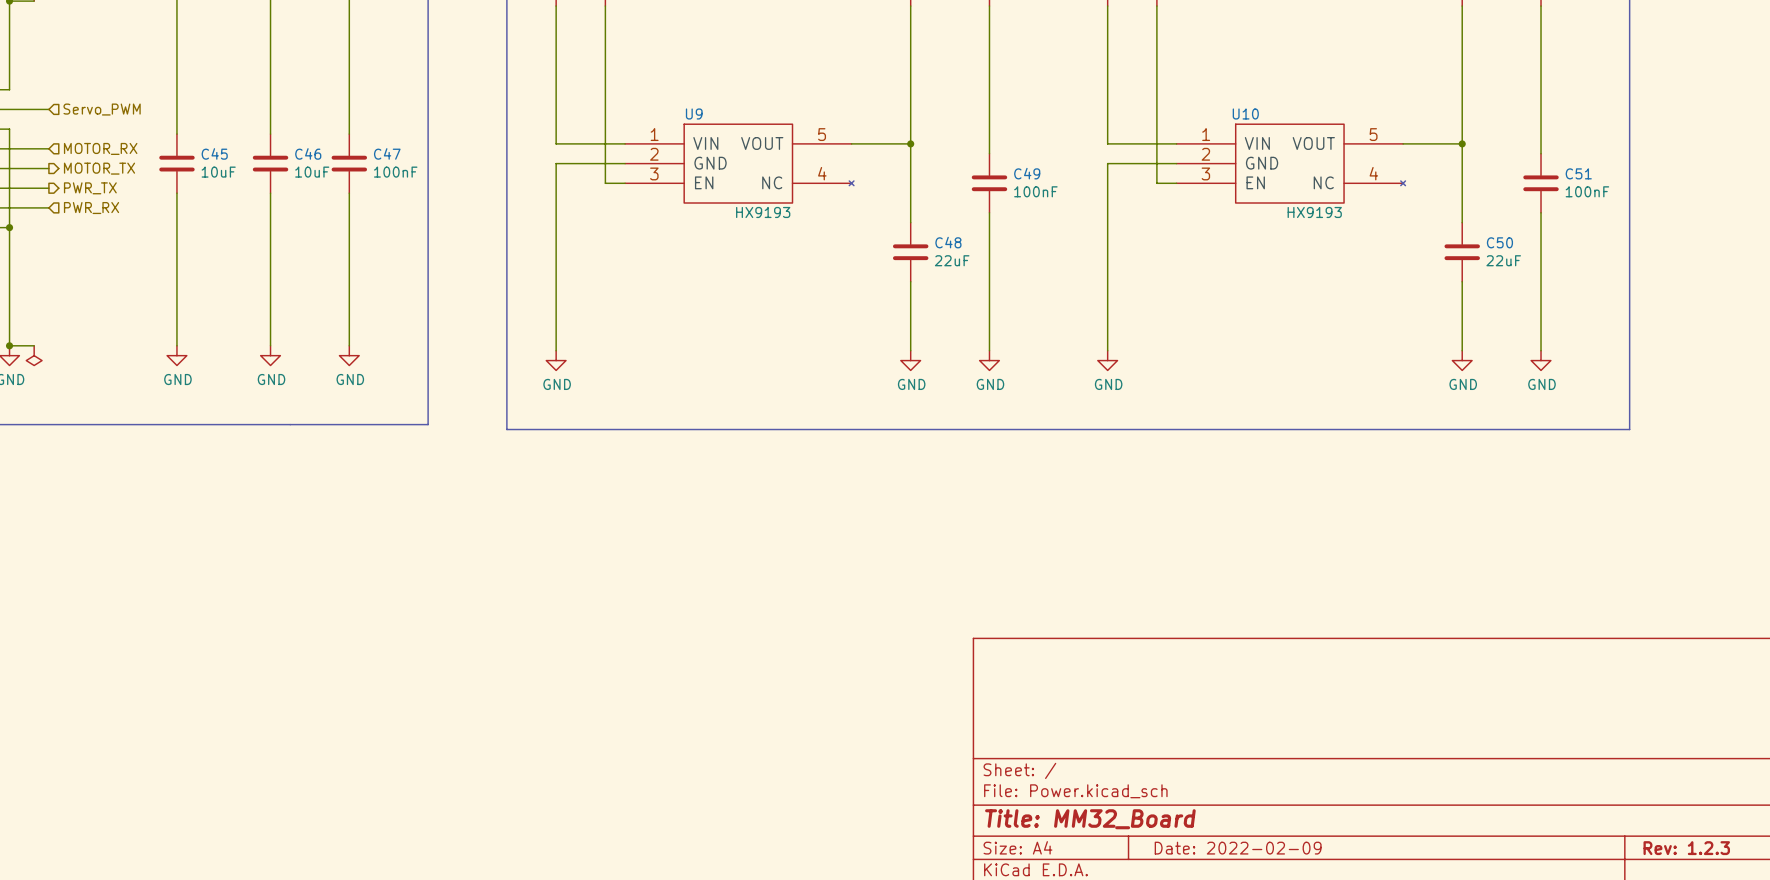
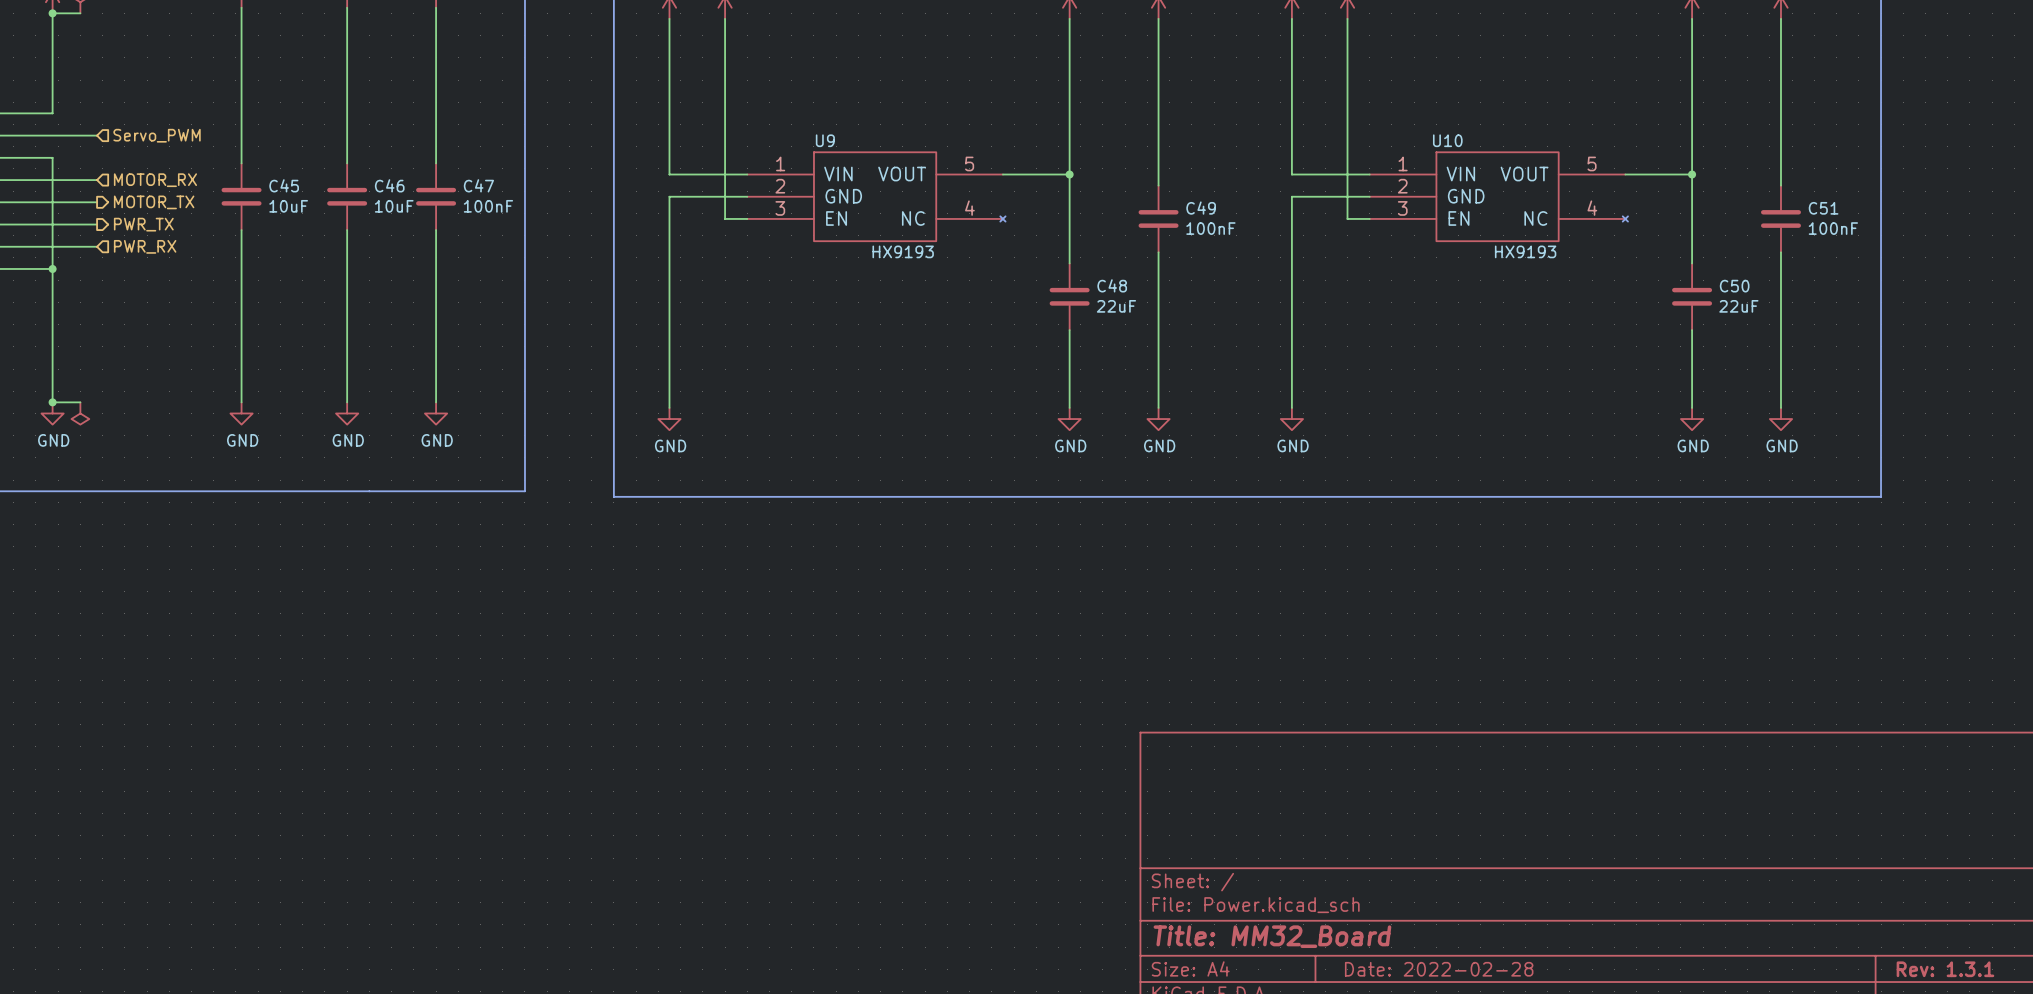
title block: Date: 2022-02-09 (1238, 848) -> Date: 2022-02-28 (1439, 969)
title block: Rev: 1.2.3 (1686, 848) -> Rev: 1.3.1 (1945, 969)

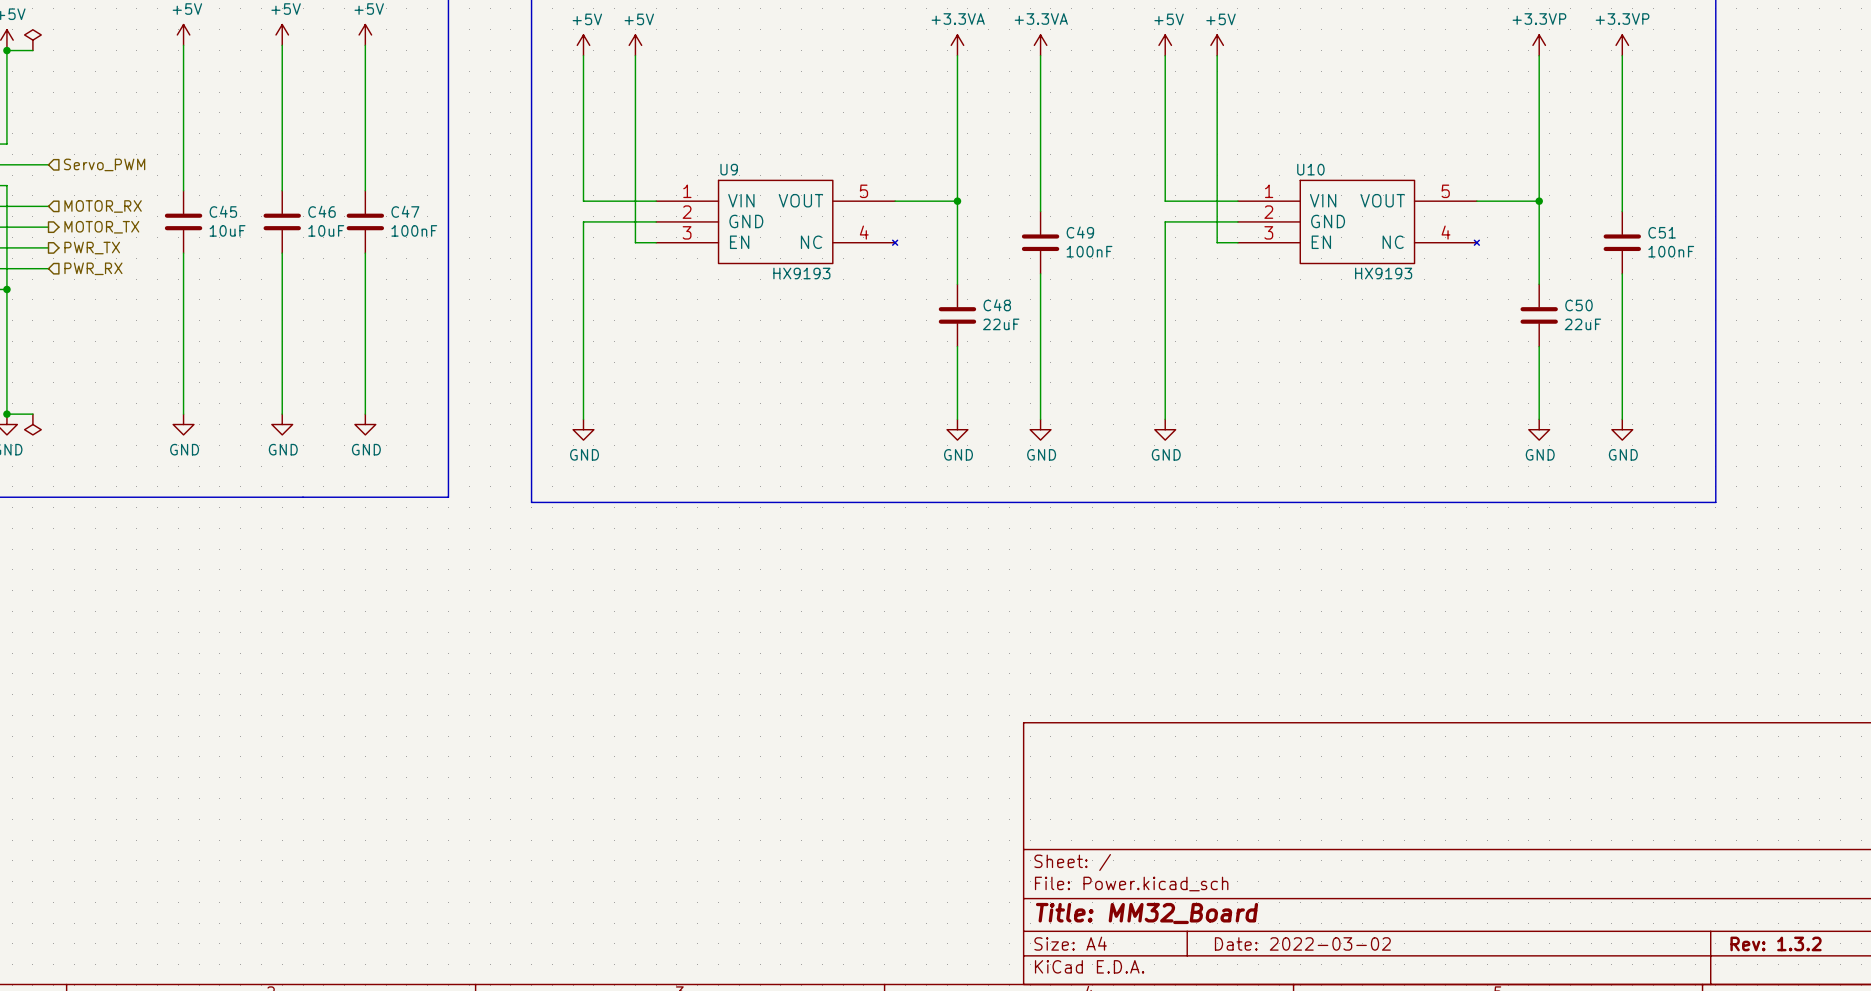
title block: Date: 2022-02-28 (1439, 969) -> Date: 2022-03-02 (1302, 943)
title block: Rev: 1.3.1 (1945, 969) -> Rev: 1.3.2 (1776, 943)

